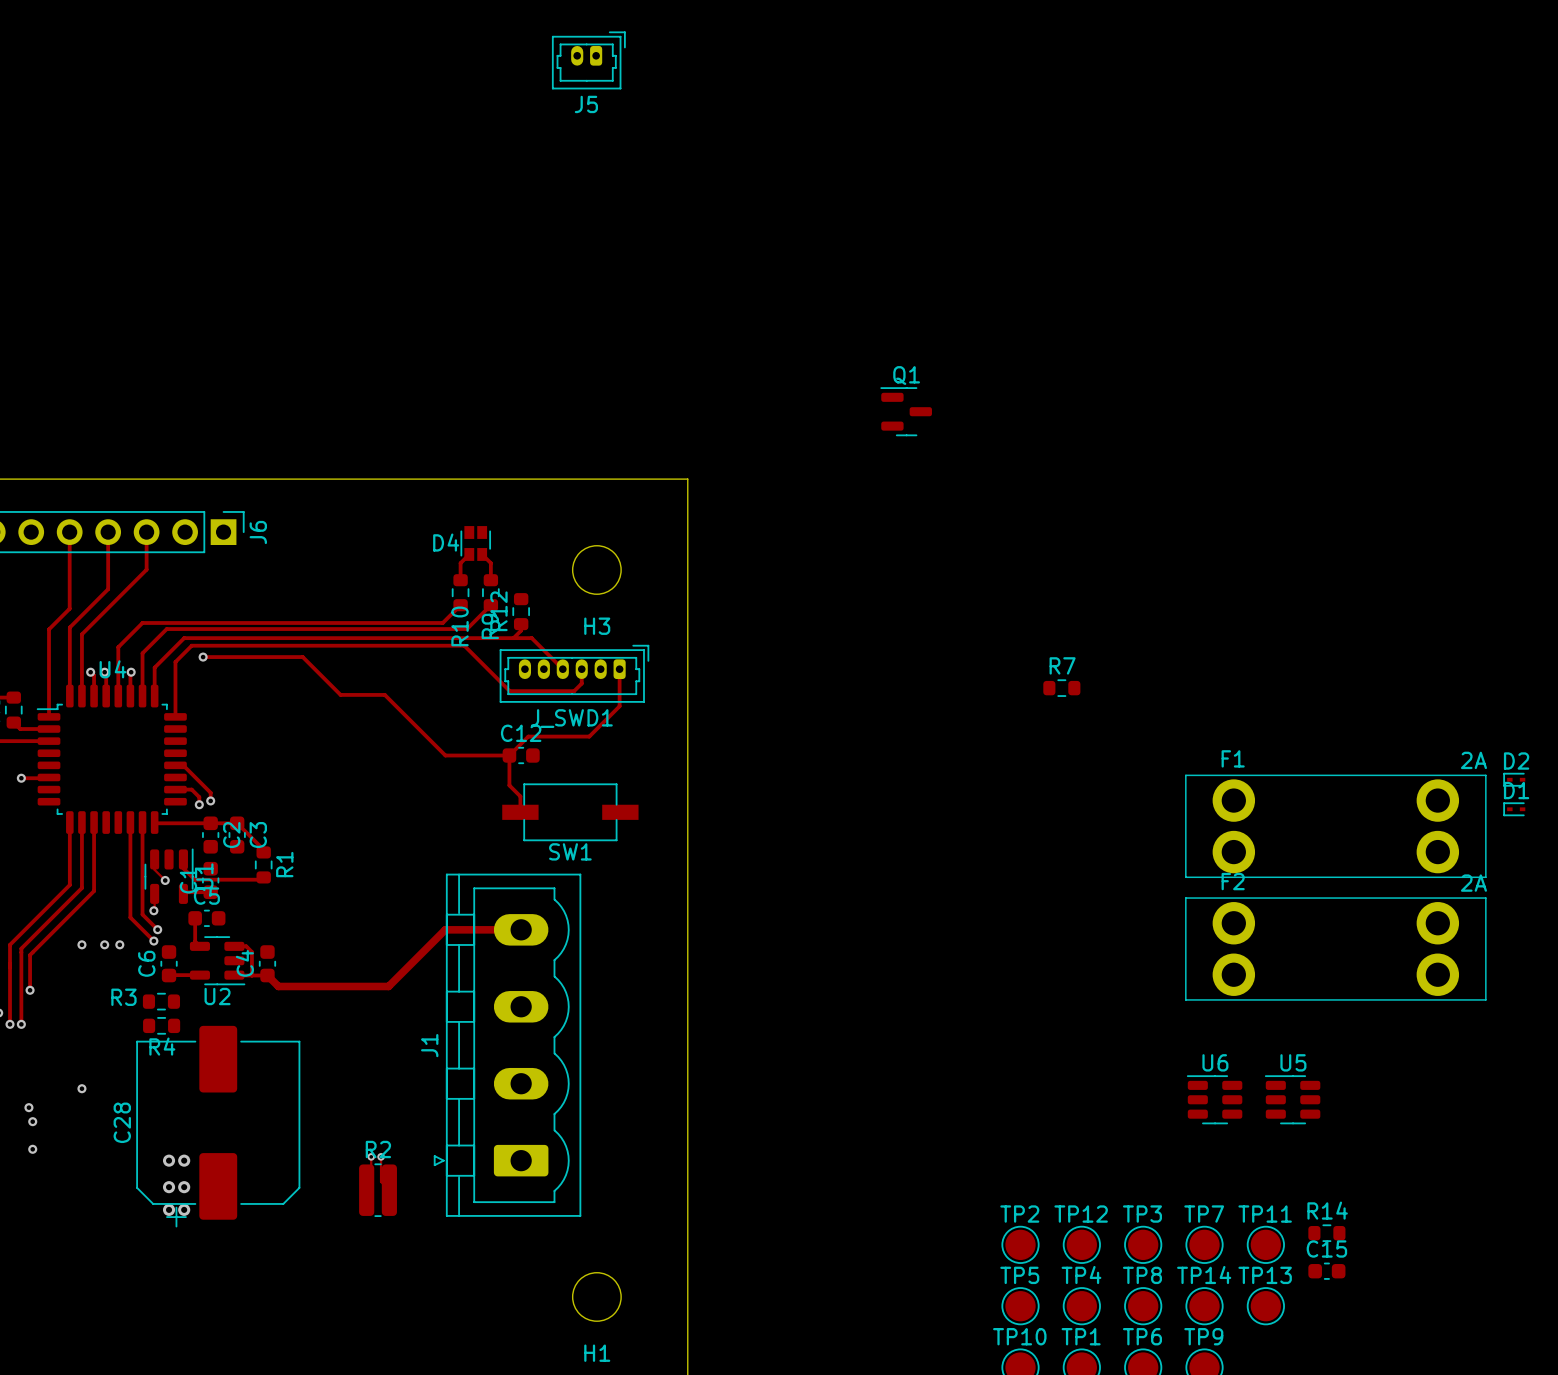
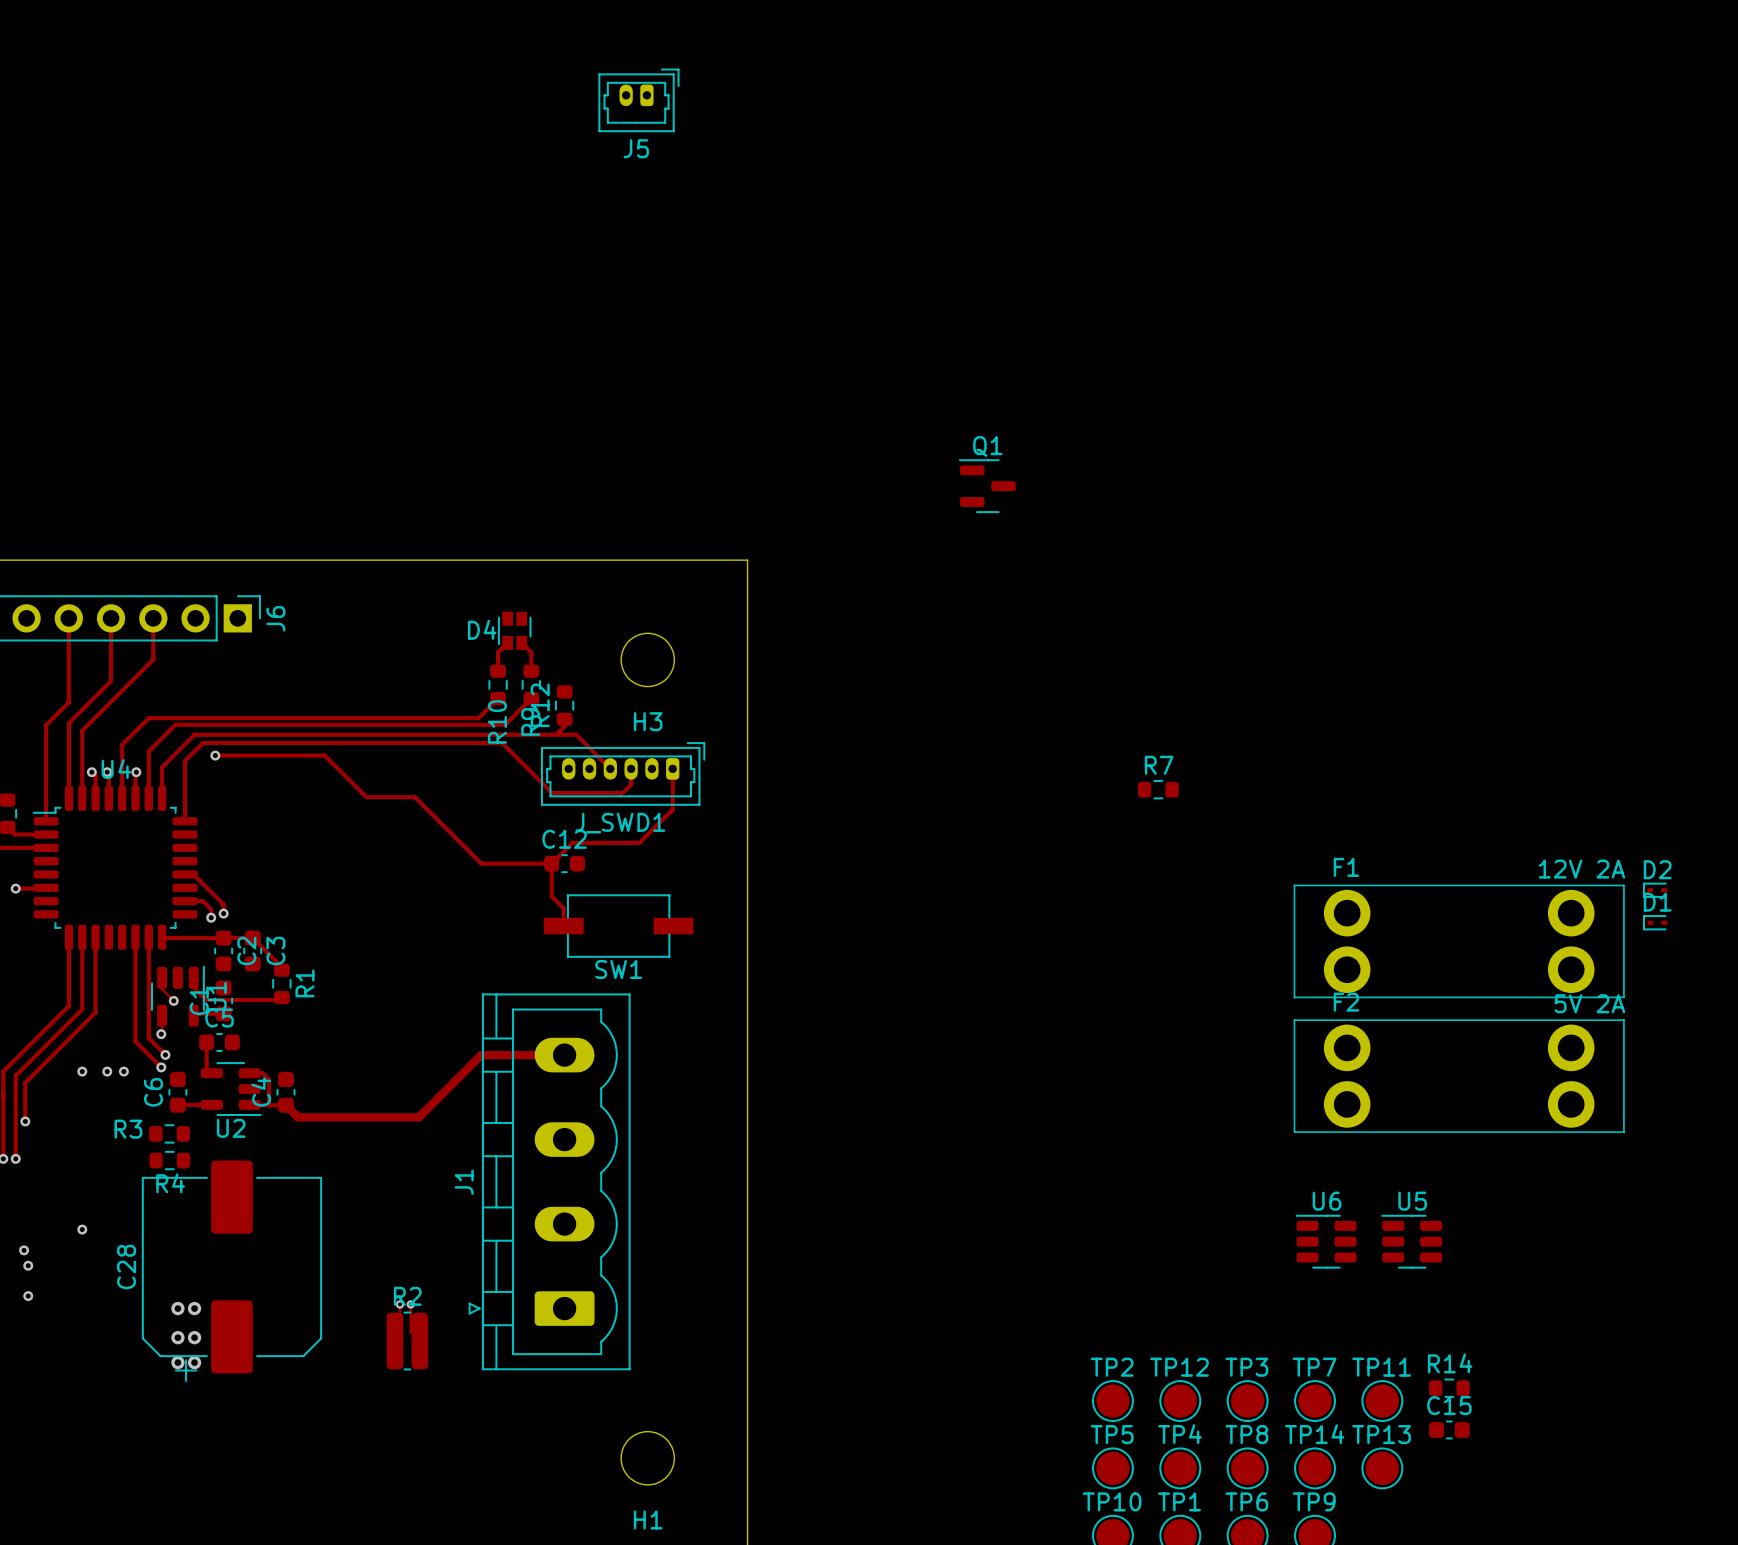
F1 value: 2A (1473, 760) -> 12V 2A (1581, 869)
F2 value: 2A (1473, 883) -> 5V 2A (1589, 1003)

